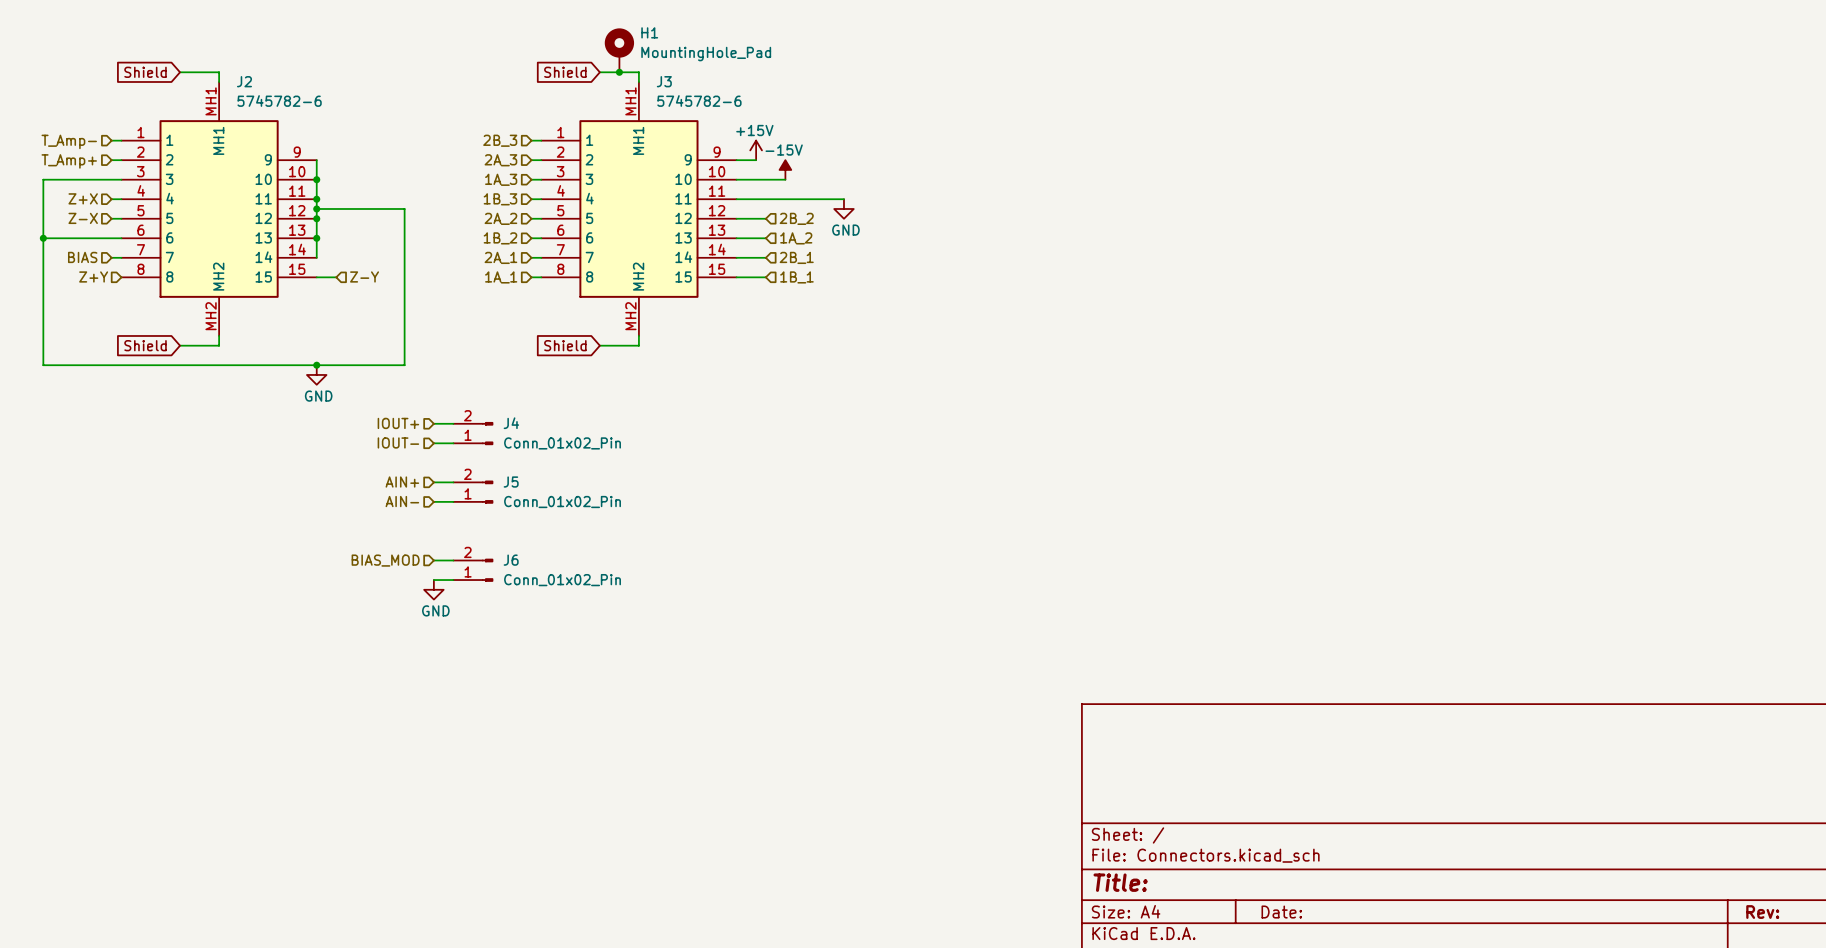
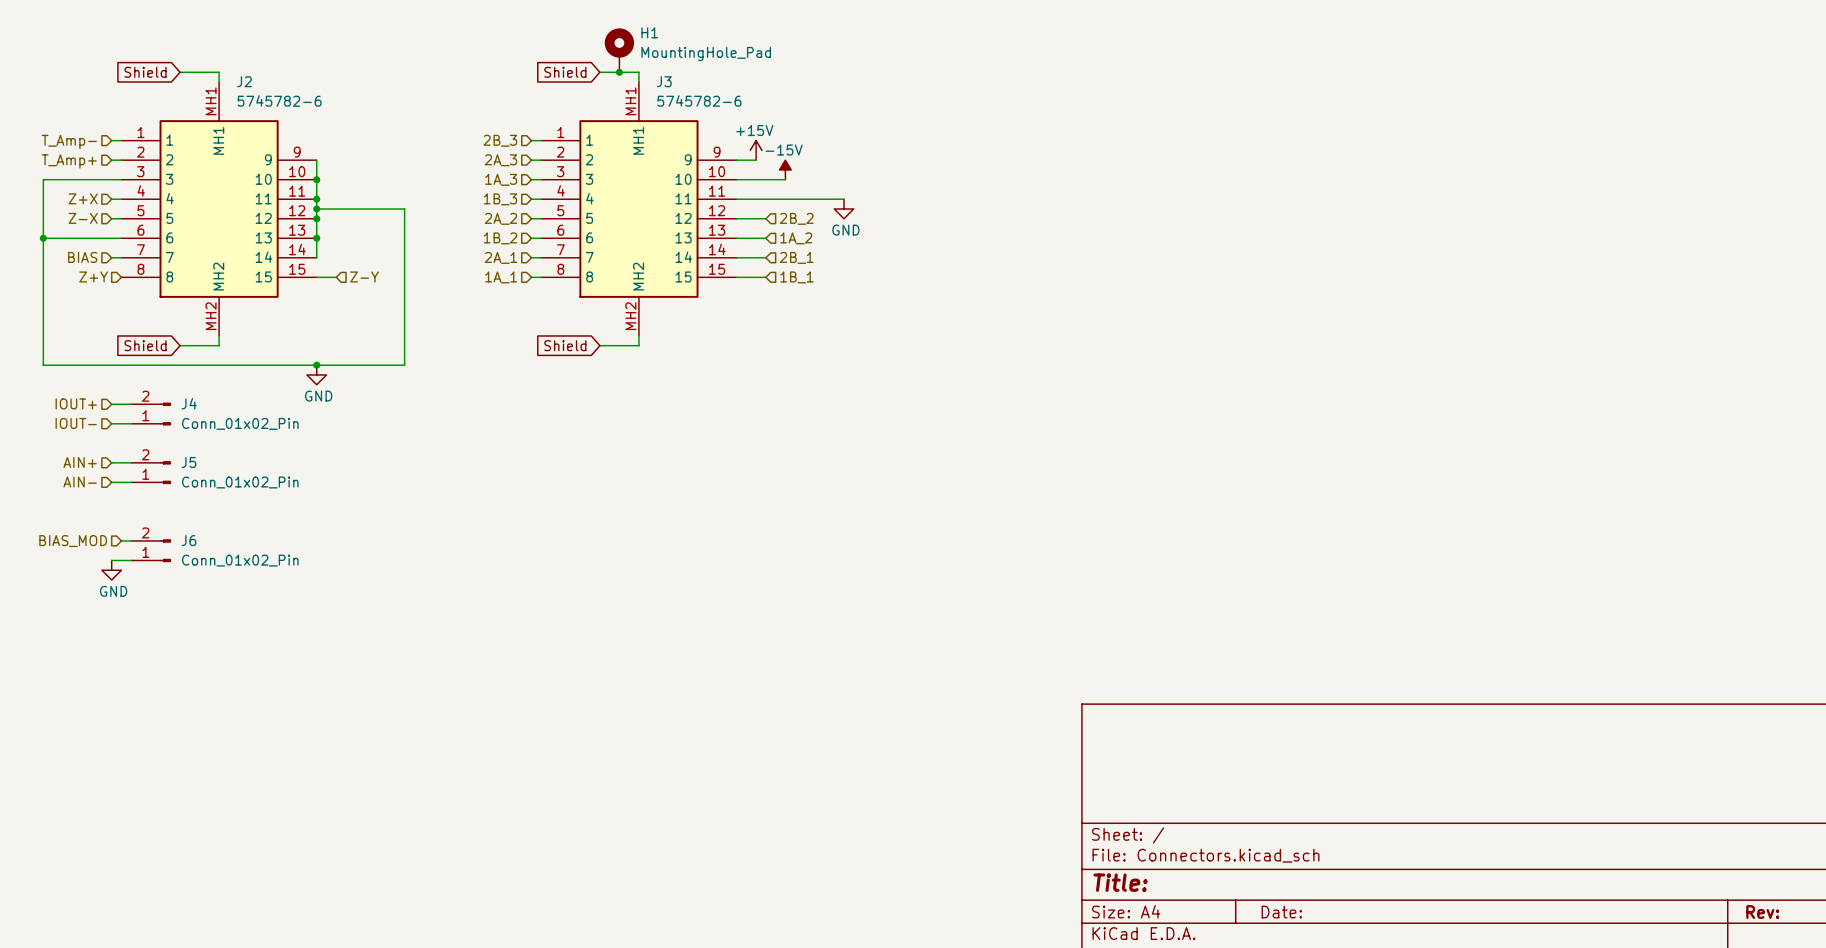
hierarchical label: none -> IOUT+ (76, 403)
wire: none -> (111, 404) (131, 404)
hierarchical label: none -> IOUT- (76, 423)
wire: none -> (111, 423) (131, 423)
hierarchical label: IOUT+ (398, 423) -> none
wire: (433, 423) (453, 423) -> none
J4 position: (473, 433) -> (151, 414)
hierarchical label: IOUT- (398, 442) -> none
wire: (433, 443) (453, 443) -> none
hierarchical label: none -> AIN+ (80, 462)
wire: none -> (111, 462) (131, 462)
hierarchical label: none -> AIN- (80, 482)
wire: none -> (111, 482) (131, 482)
hierarchical label: AIN+ (402, 482) -> none
wire: (433, 482) (453, 482) -> none
J5 position: (473, 492) -> (151, 472)
hierarchical label: AIN- (402, 501) -> none
wire: (433, 501) (453, 501) -> none
wire: none -> (121, 540) (131, 540)
hierarchical label: none -> BIAS_MOD (73, 541)
wire: none -> (111, 560) (131, 560)
hierarchical label: BIAS_MOD (385, 560) -> none
wire: (433, 560) (453, 560) -> none
power symbol: none -> GND (111, 570)
J6 position: (473, 570) -> (151, 550)
wire: (433, 580) (453, 580) -> none
power symbol: GND (433, 589) -> none

